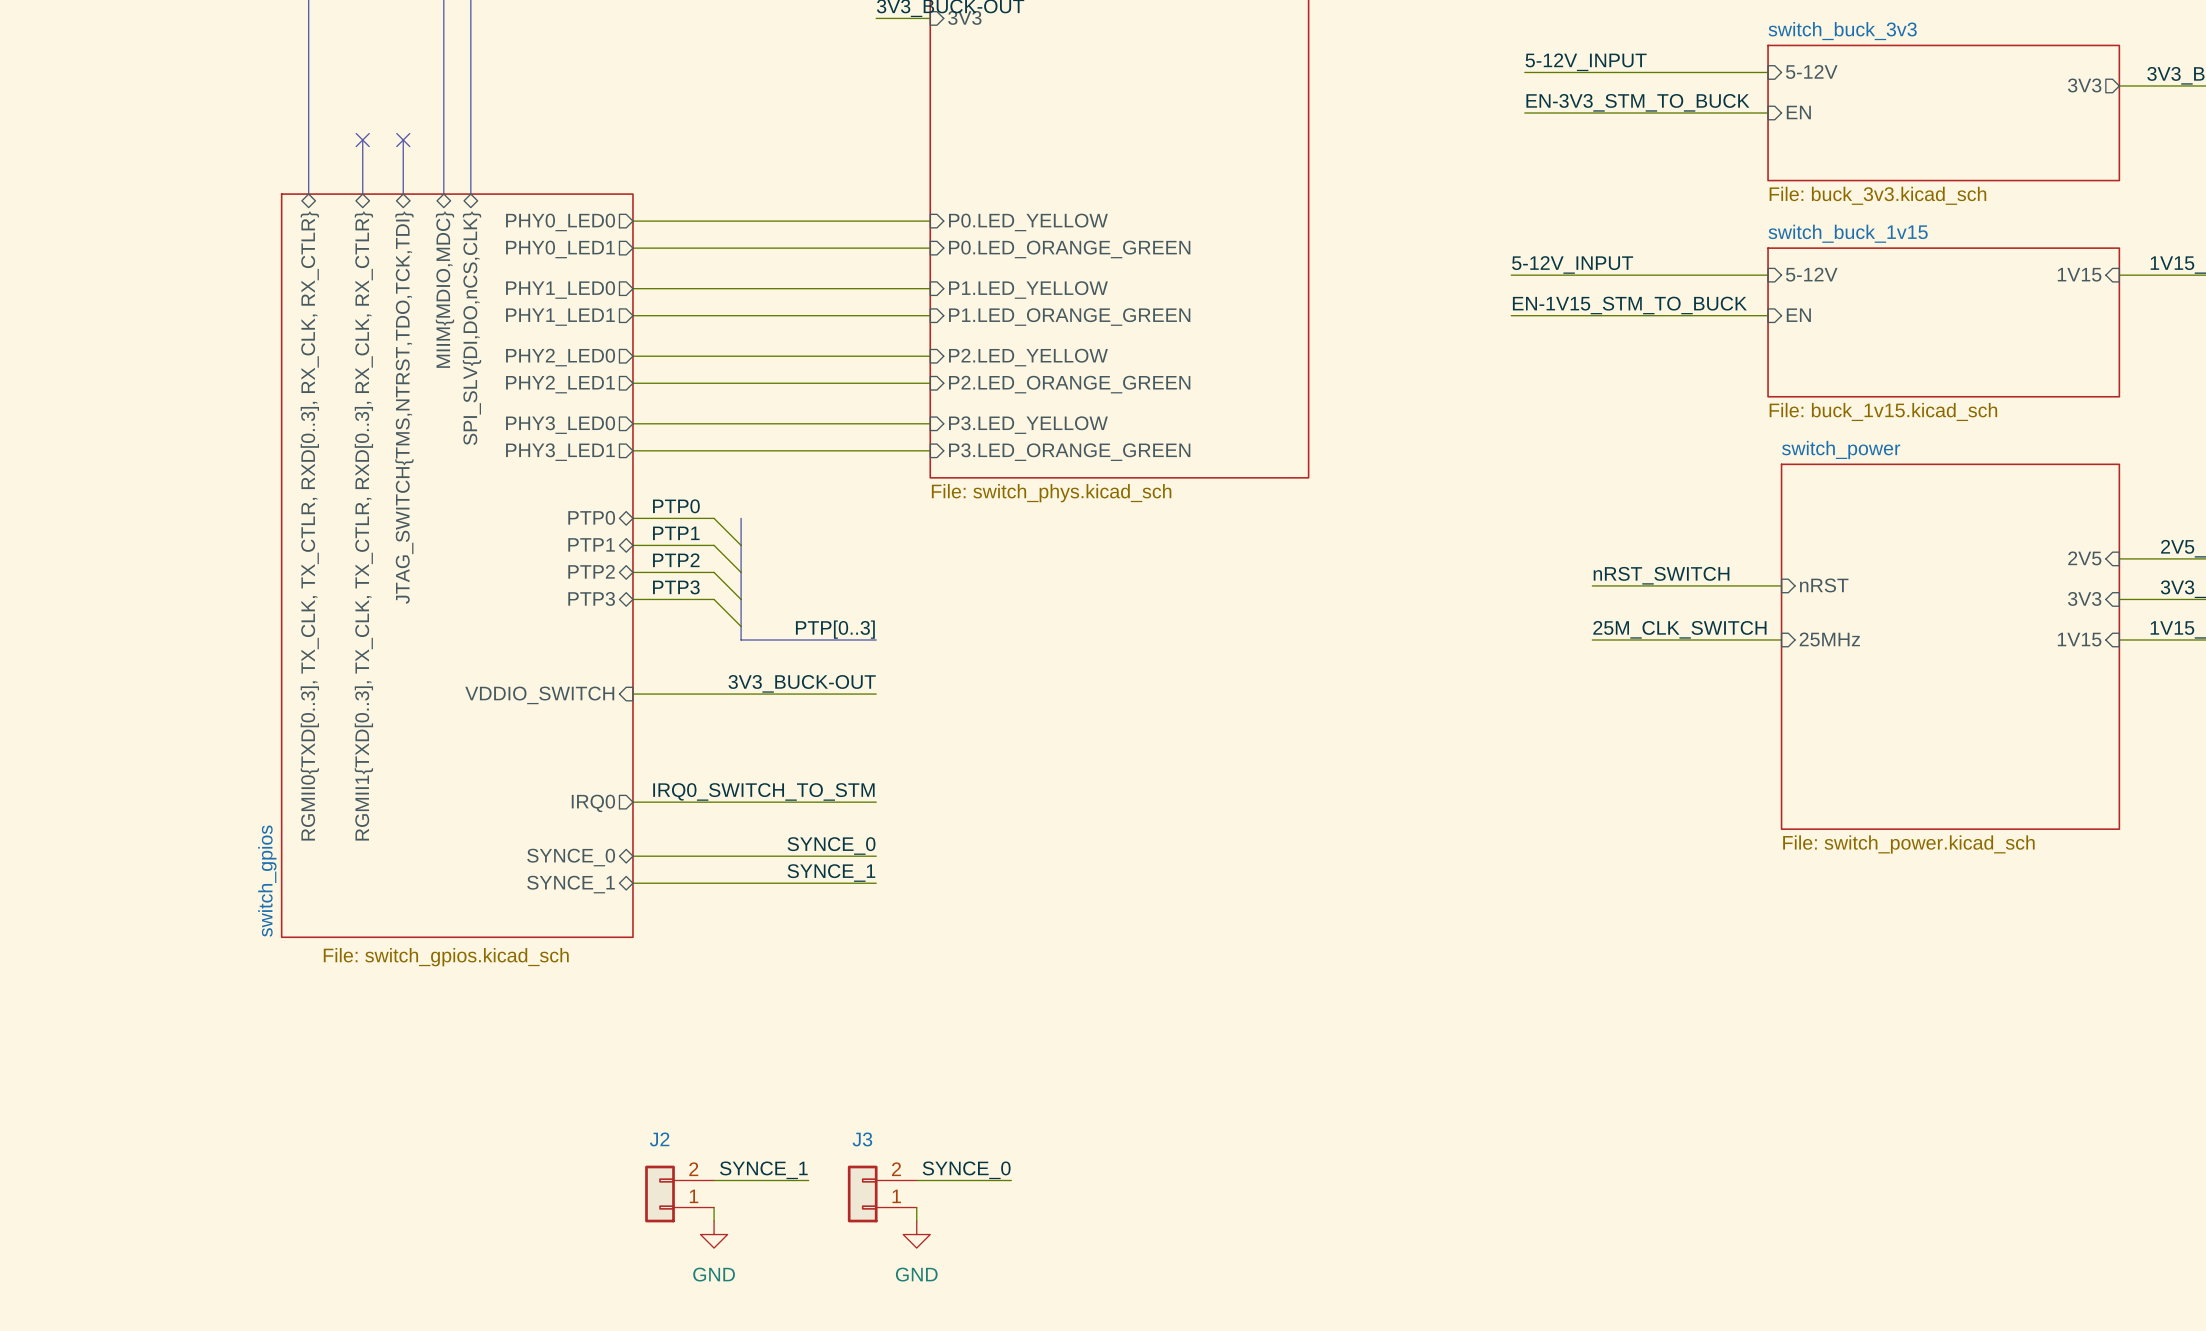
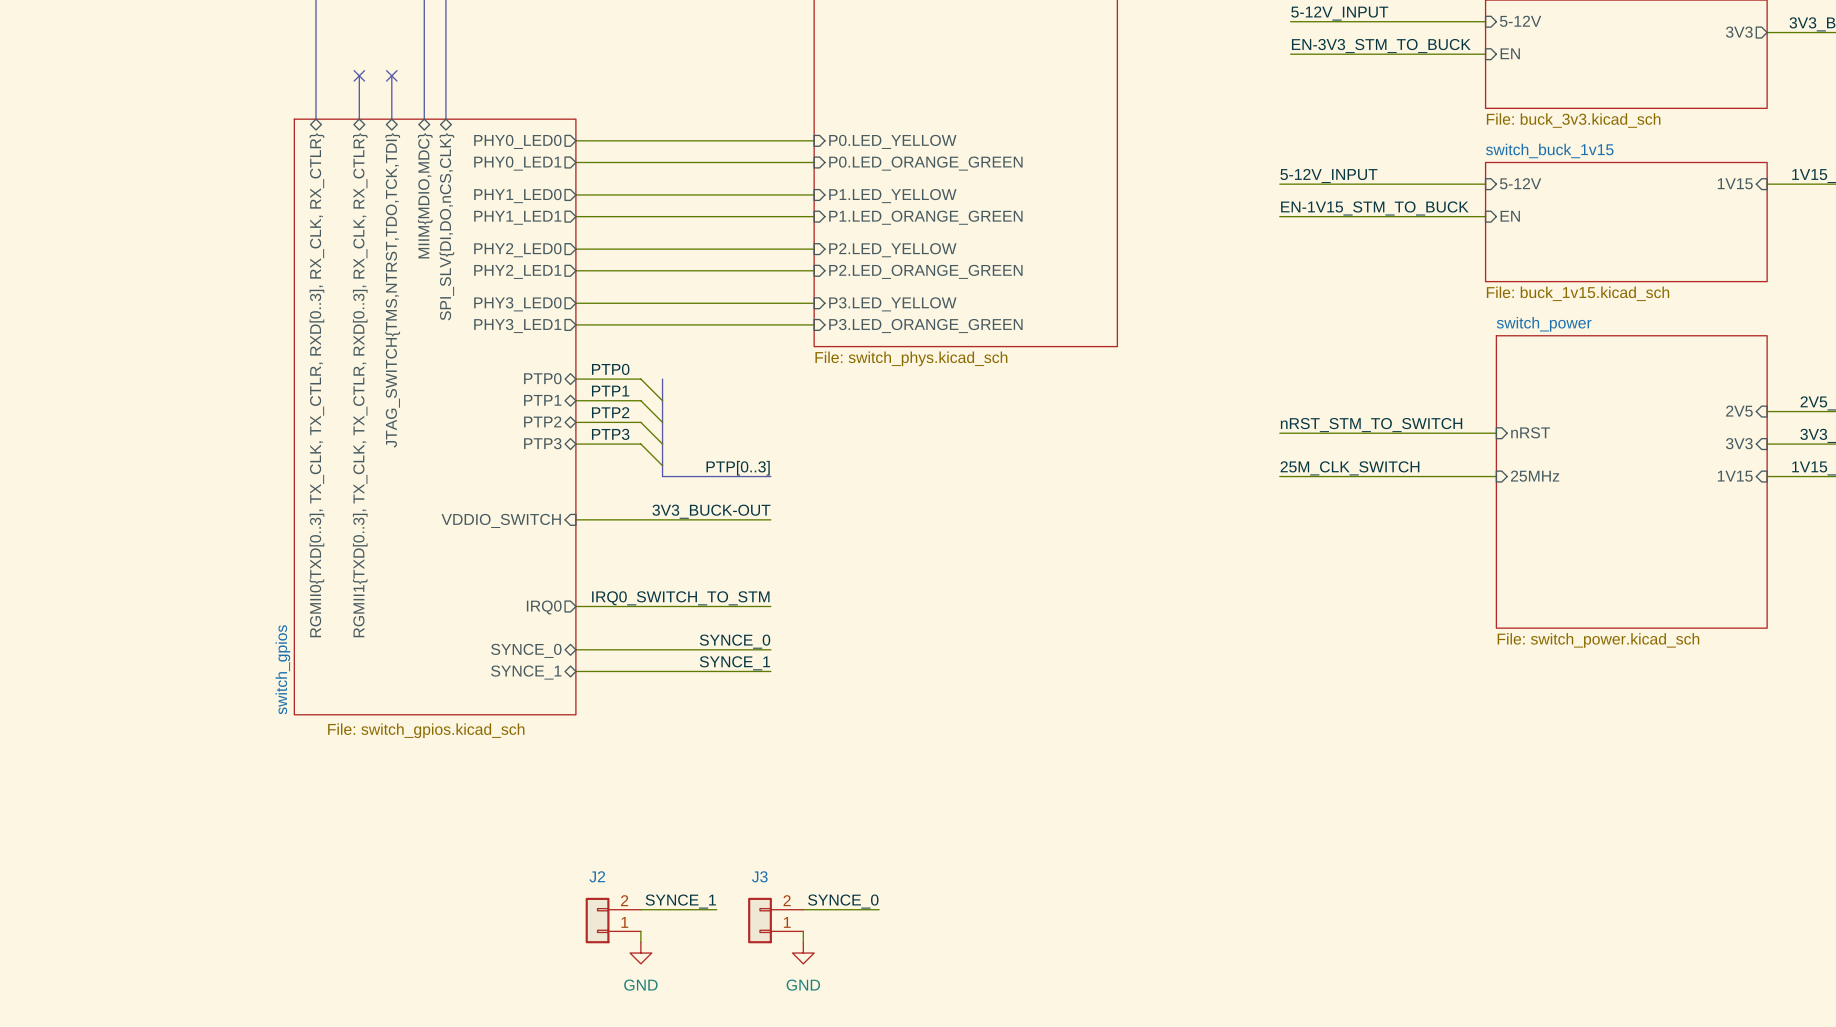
label: nRST_SWITCH (1661, 575) -> nRST_STM_TO_SWITCH (1371, 425)
wire: none -> (1279, 433) (1344, 433)
label position: 25M_CLK_SWITCH (1679, 629) -> 25M_CLK_SWITCH (1349, 468)
wire: none -> (1279, 476) (1344, 476)

